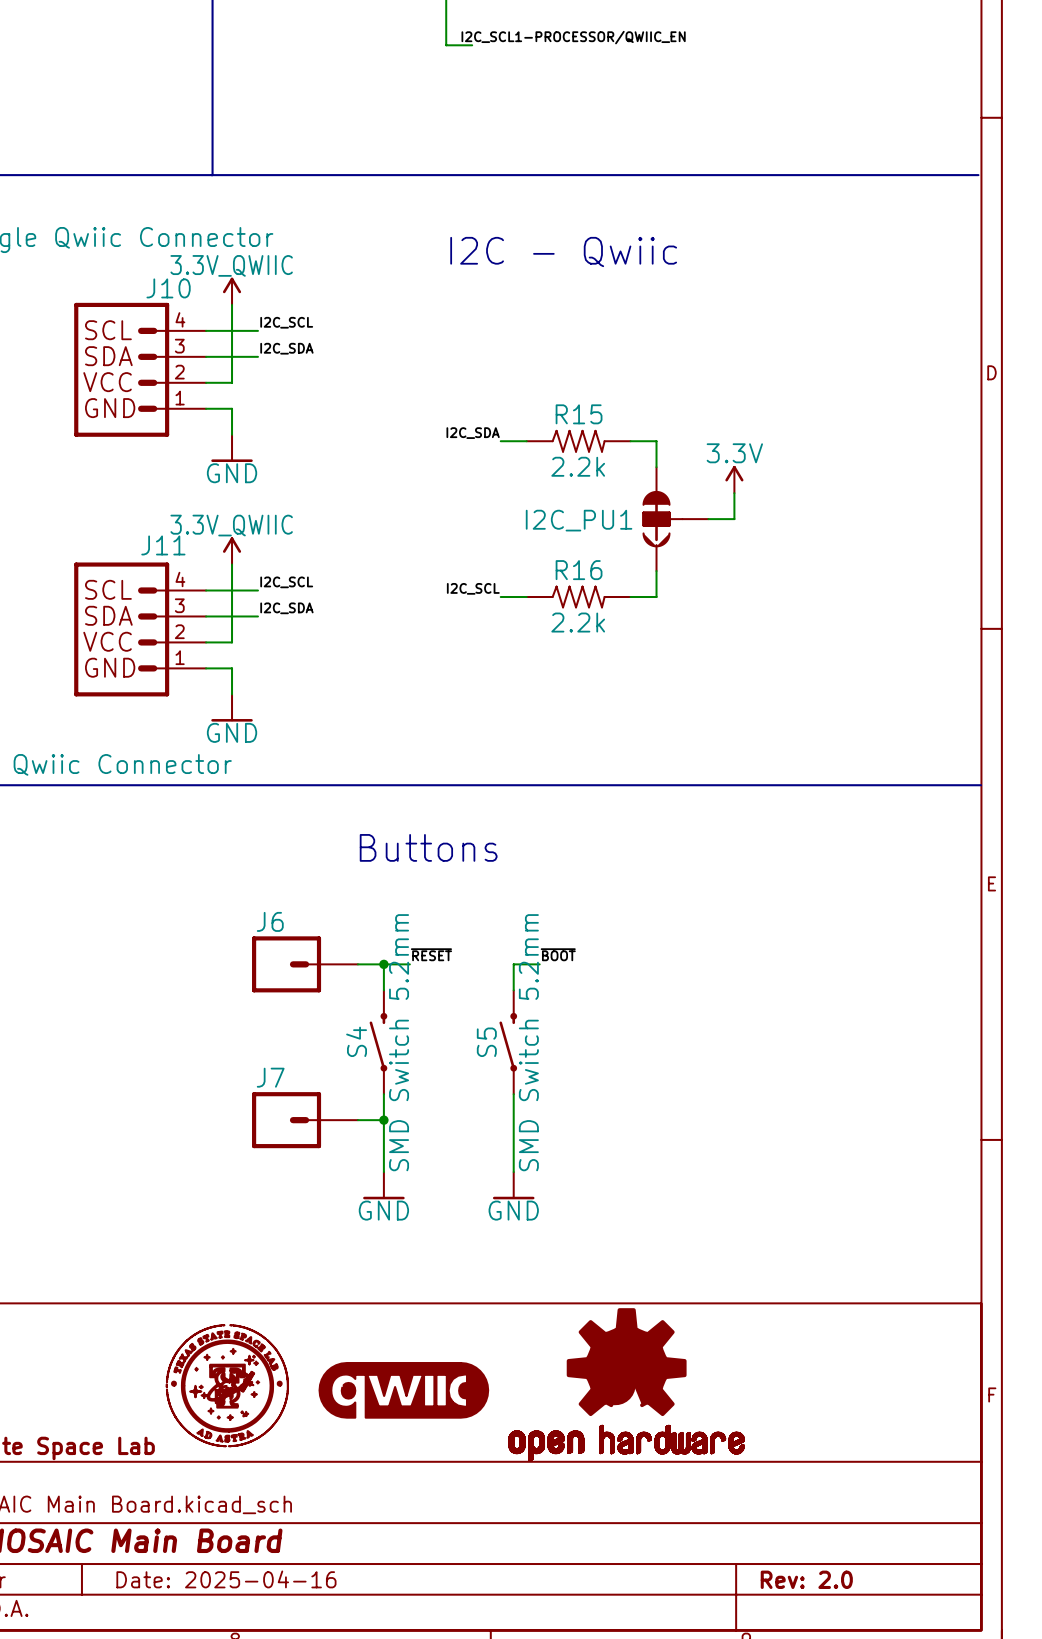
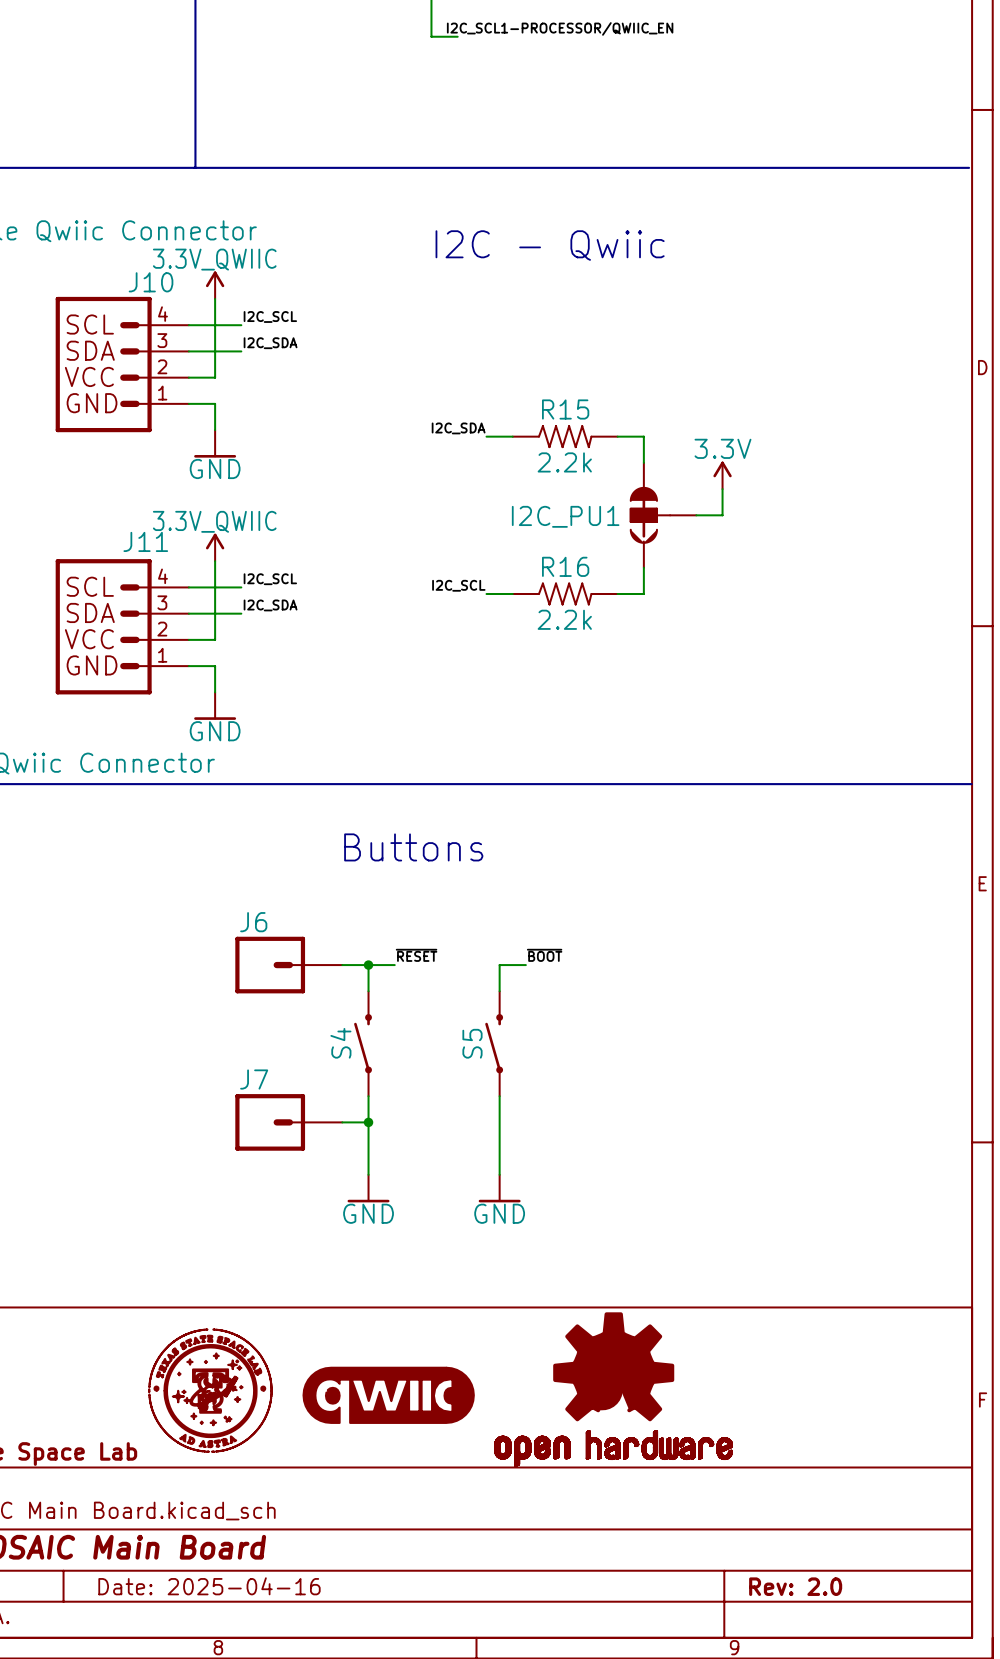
S4 value: SMD Switch 5.2mm (399, 1042) -> none
S5 value: SMD Switch 5.2mm (528, 1042) -> none

